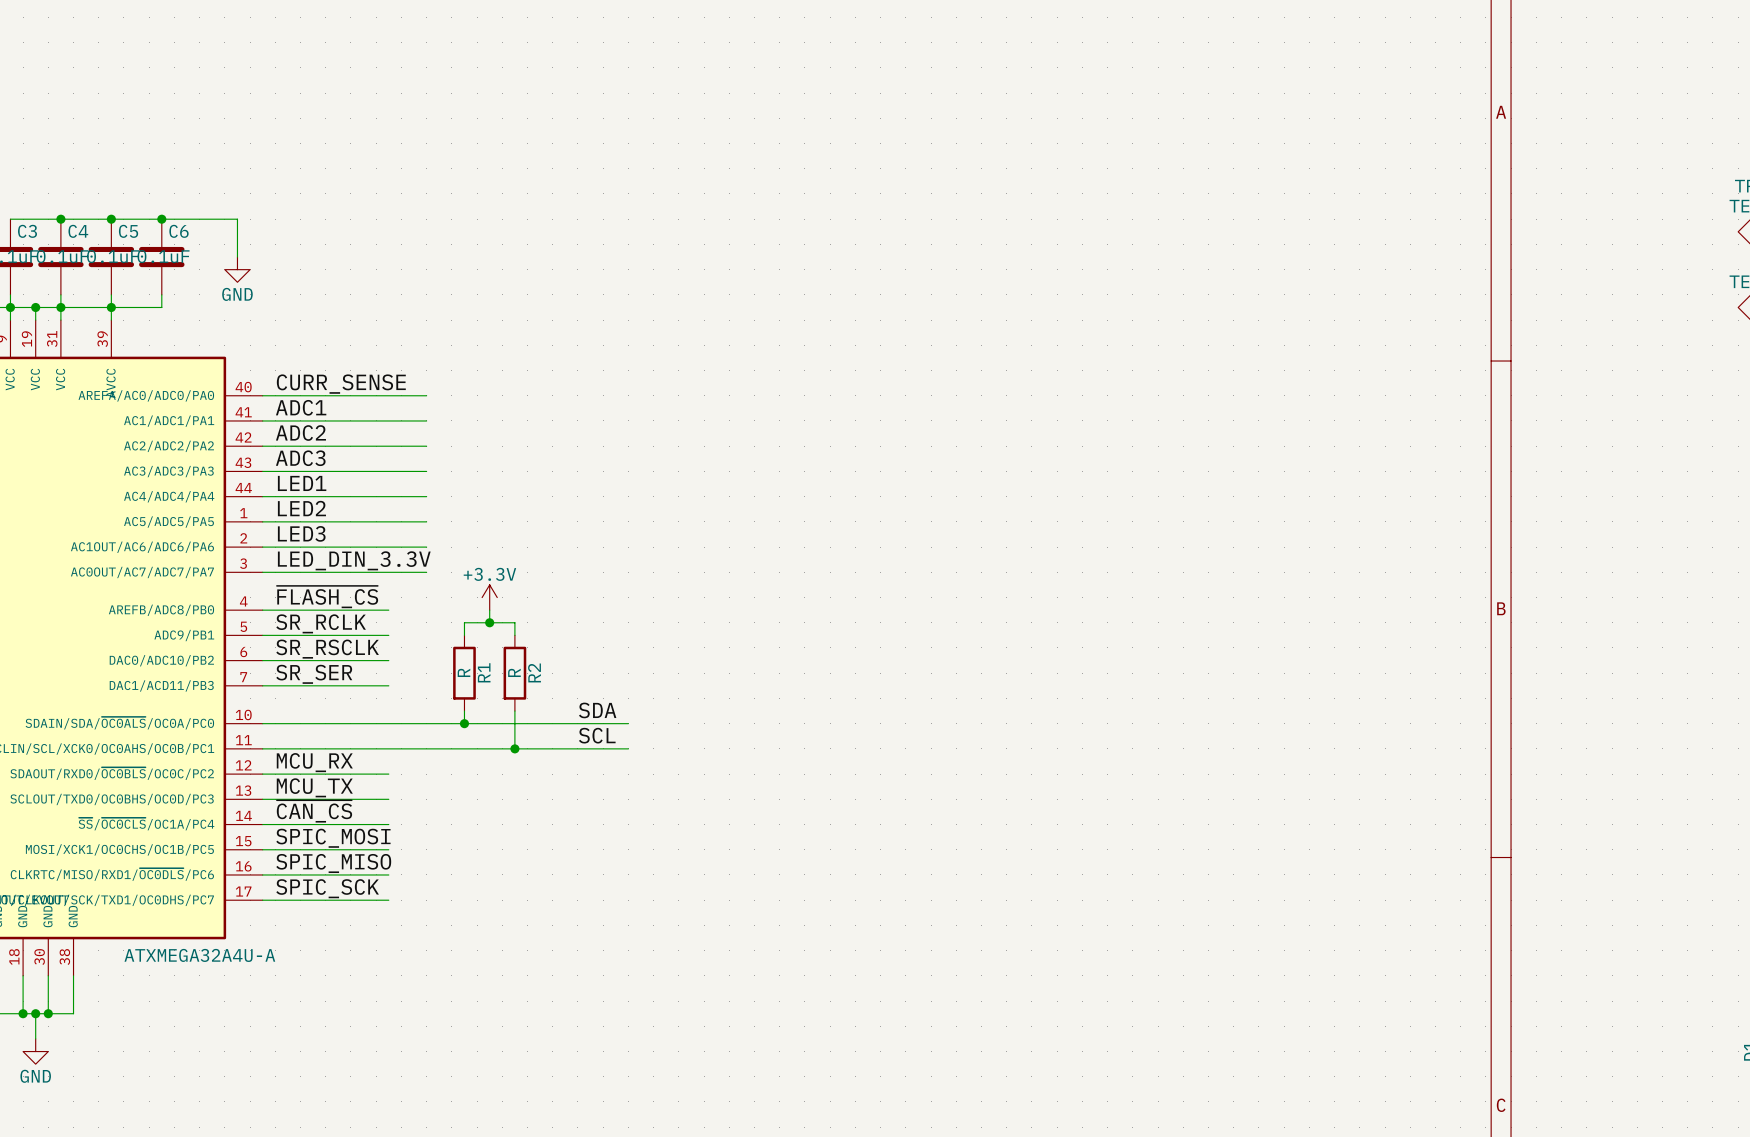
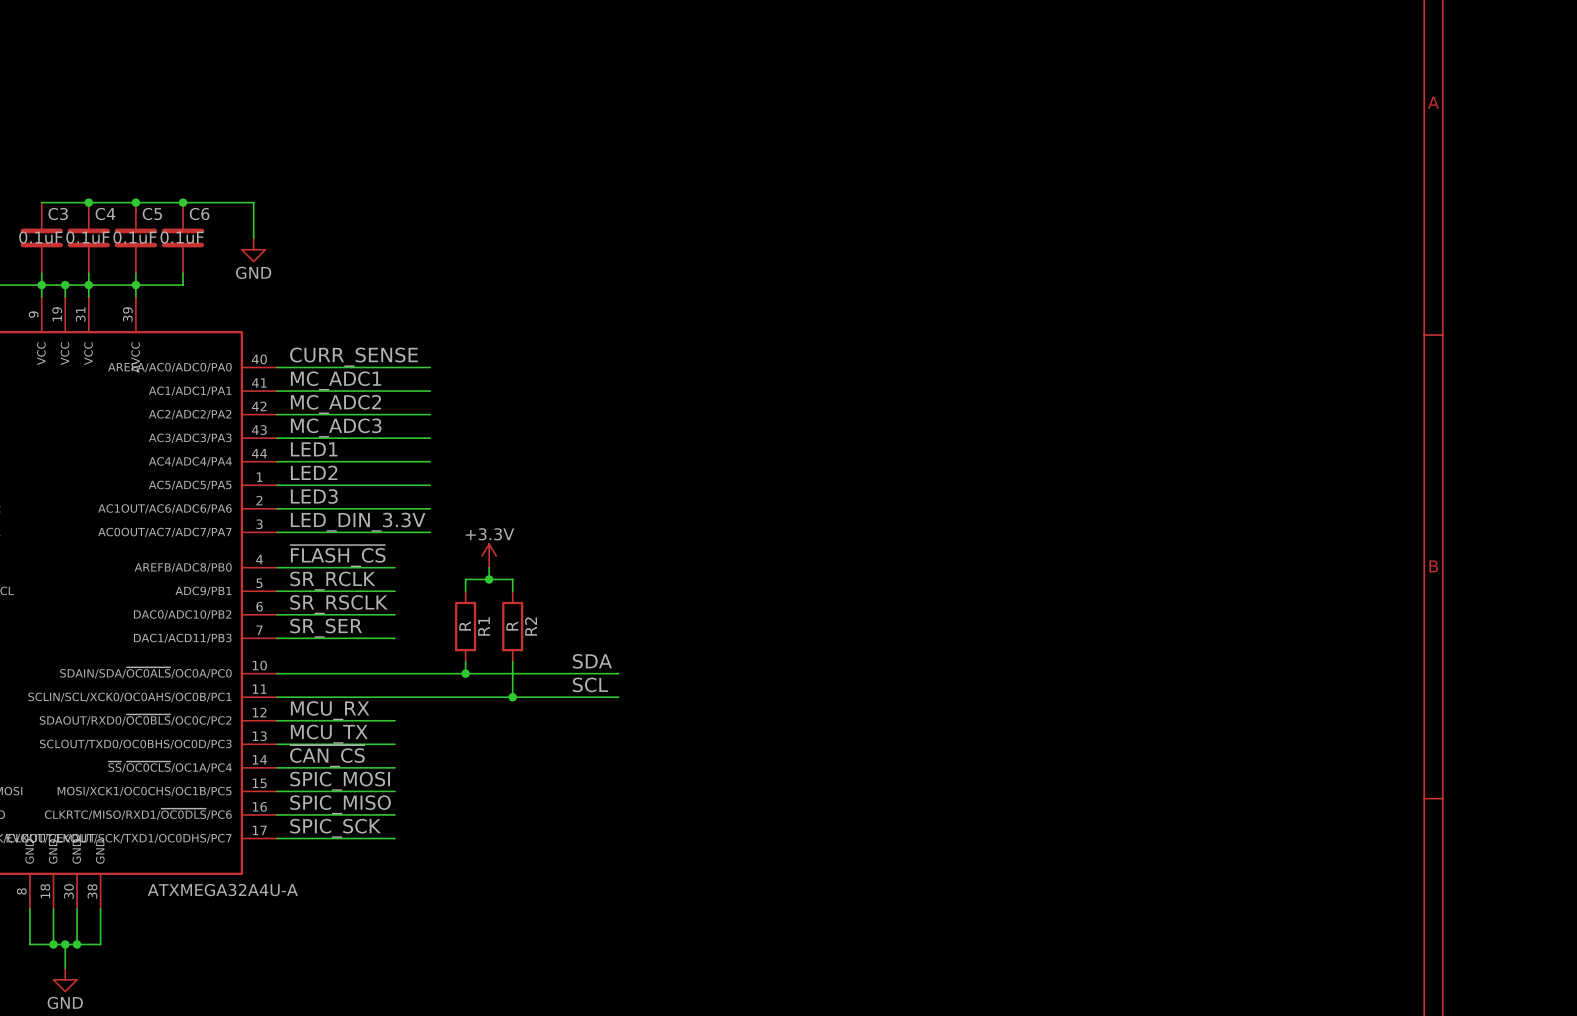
label: ADC1 (301, 407) -> MC_ADC1 (336, 380)
label: ADC2 (300, 433) -> MC_ADC2 (335, 404)
label: ADC3 (300, 458) -> MC_ADC3 (336, 427)

